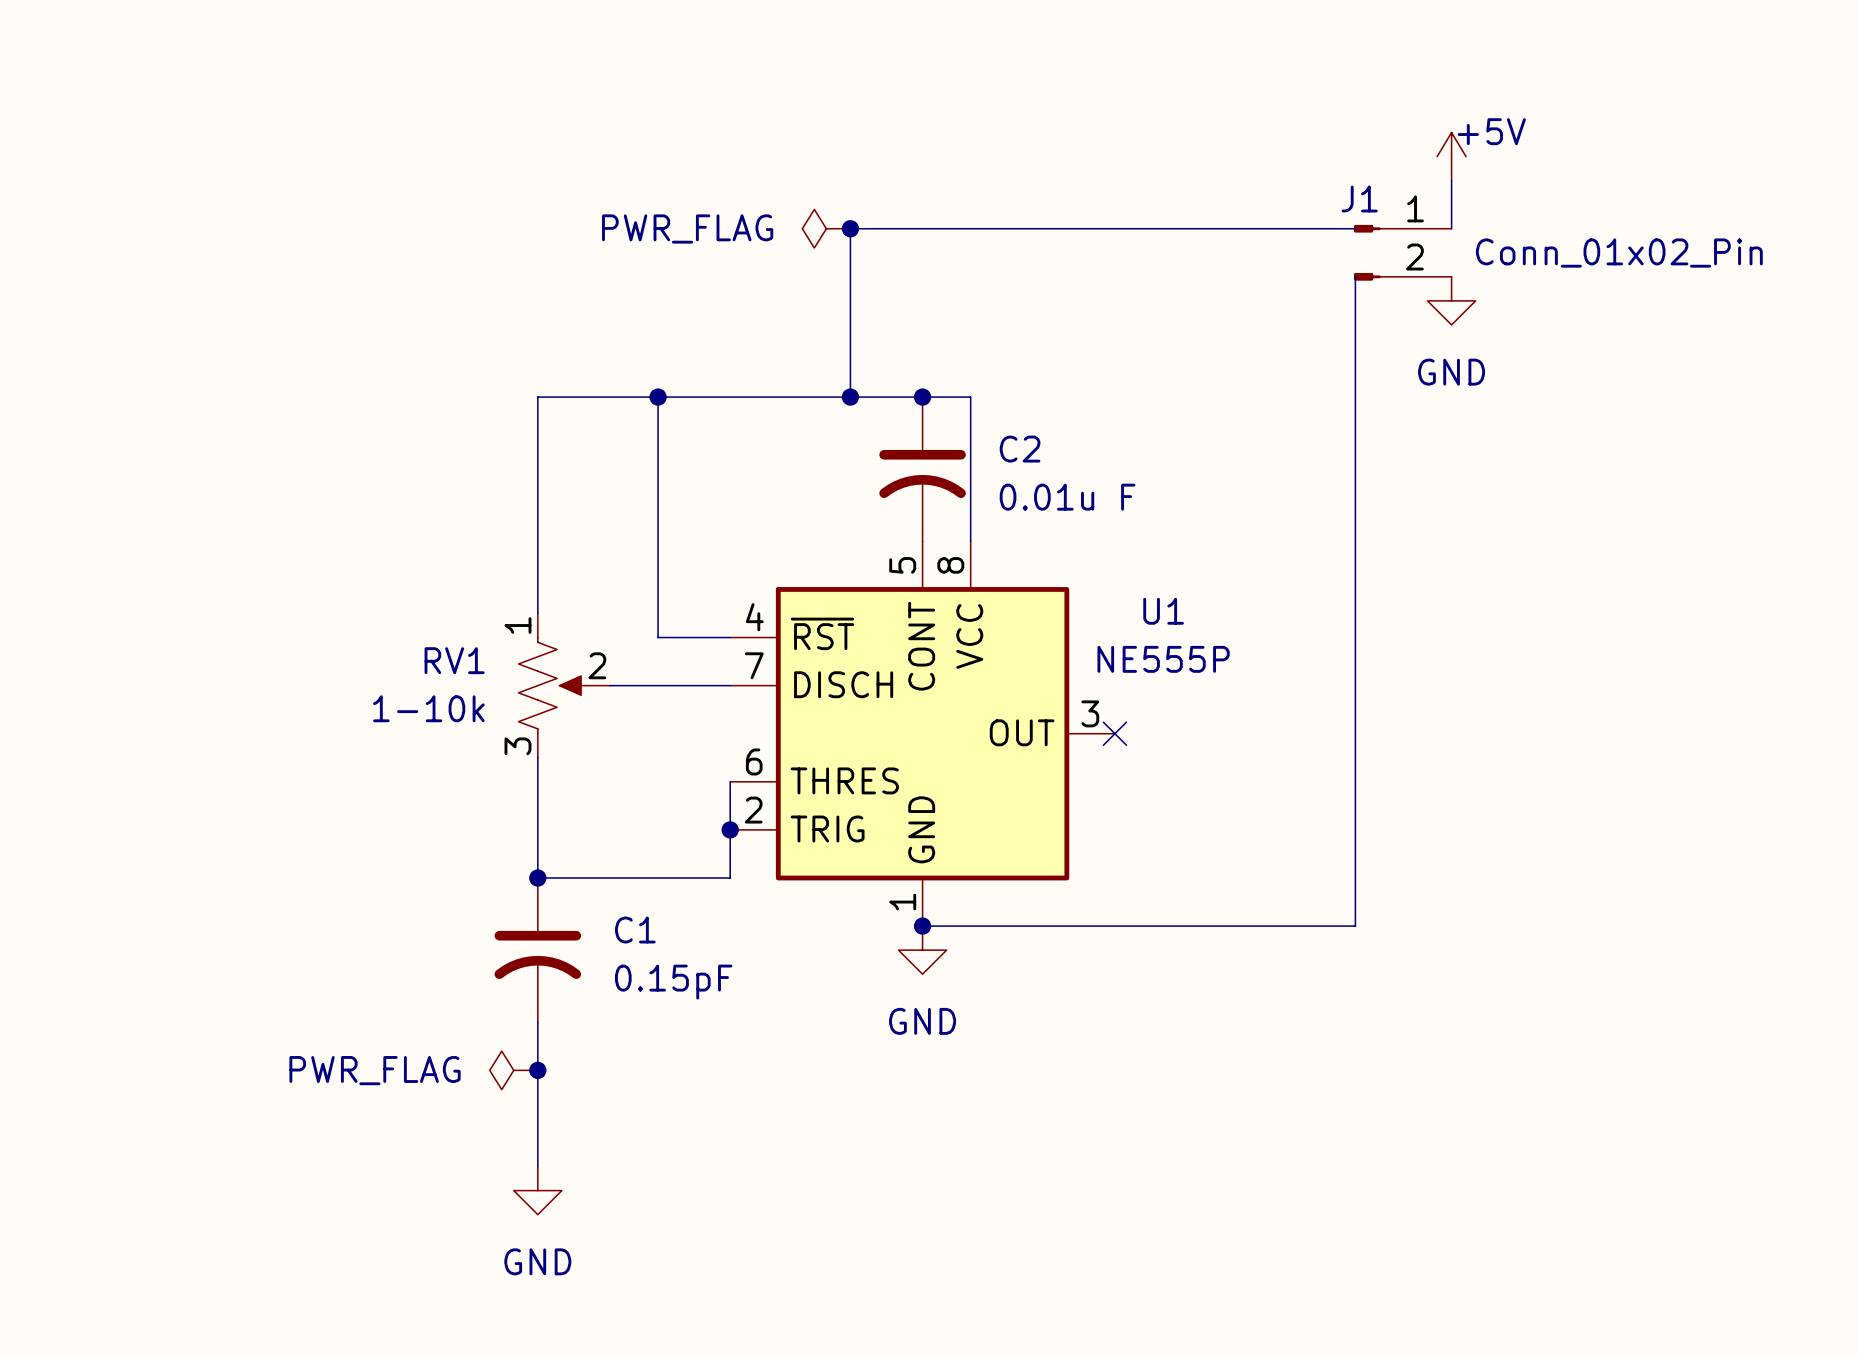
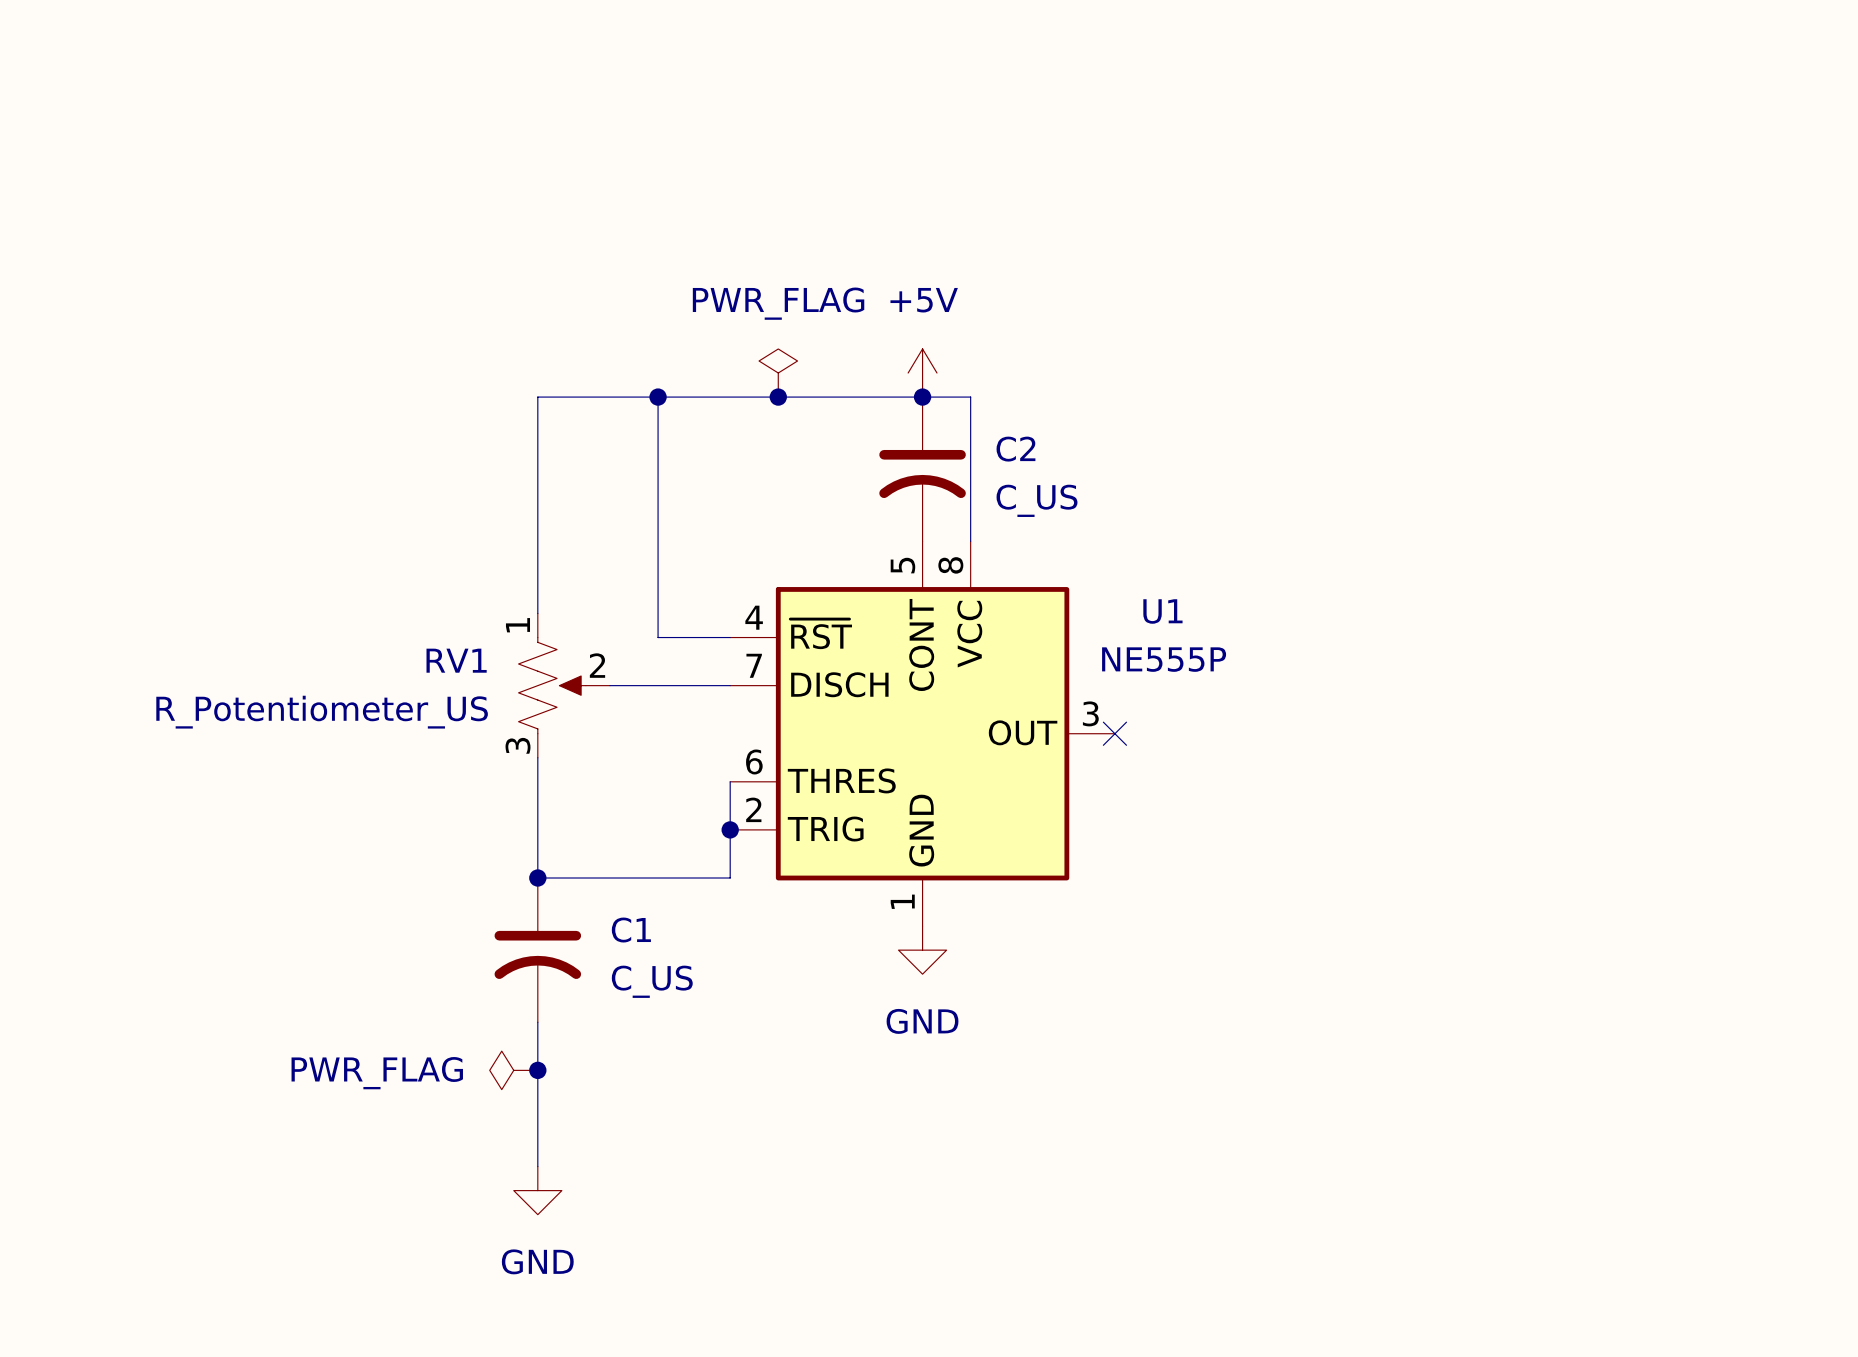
power symbol: +5V (1451, 156) -> none
wire: (1451, 180) (1451, 228) -> none
power symbol text position: PWR_FLAG (687, 228) -> PWR_FLAG (778, 303)
power symbol rotation: 0° (826, 228) -> 90° clockwise (778, 373)
power symbol position: PWR_FLAG (826, 228) -> PWR_FLAG (778, 373)
junction: (850, 228) -> none
wire: (1355, 228) (850, 228) (850, 397) -> none
J1: Conn_01x02_Pin (1402, 252) -> none
wire: (1355, 276) (1355, 926) (922, 926) -> none
power symbol: GND (1451, 300) -> none
power symbol: none -> +5V (922, 373)
junction position: (850, 397) -> (778, 397)
C2 value: 0.01u F (1067, 497) -> C_US (1037, 500)
RV1 value: 1-10k (428, 708) -> R_Potentiometer_US (322, 712)
junction: (922, 926) -> none
C1 value: 0.15pF (673, 982) -> C_US (652, 981)

